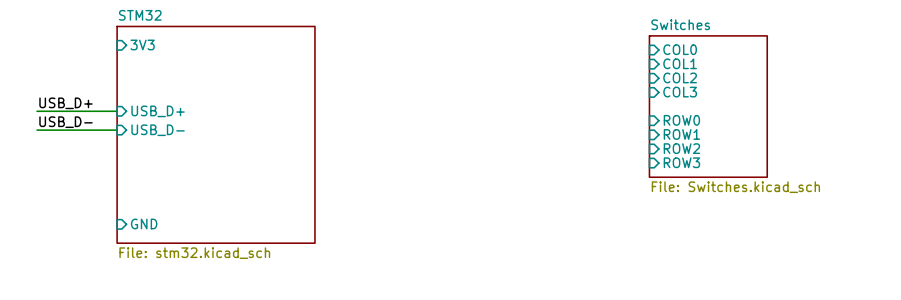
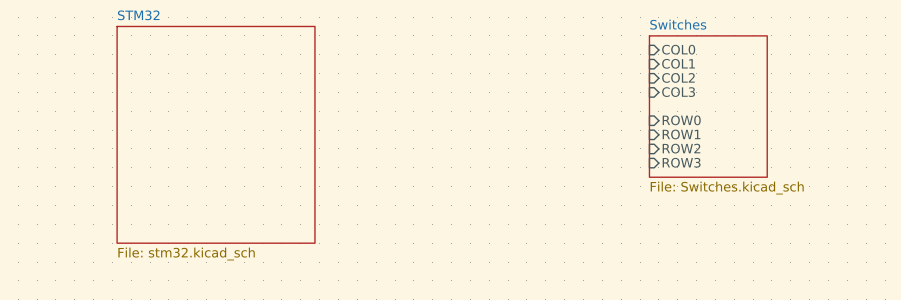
sheet pin: 3V3 (142, 44) -> none
label: USB_D+ (66, 103) -> none
wire: (37, 111) (117, 111) -> none
sheet pin: USB_D+ (158, 111) -> none
label: USB_D- (66, 122) -> none
wire: (37, 130) (117, 130) -> none
sheet pin: USB_D- (158, 130) -> none
sheet pin: GND (144, 223) -> none

